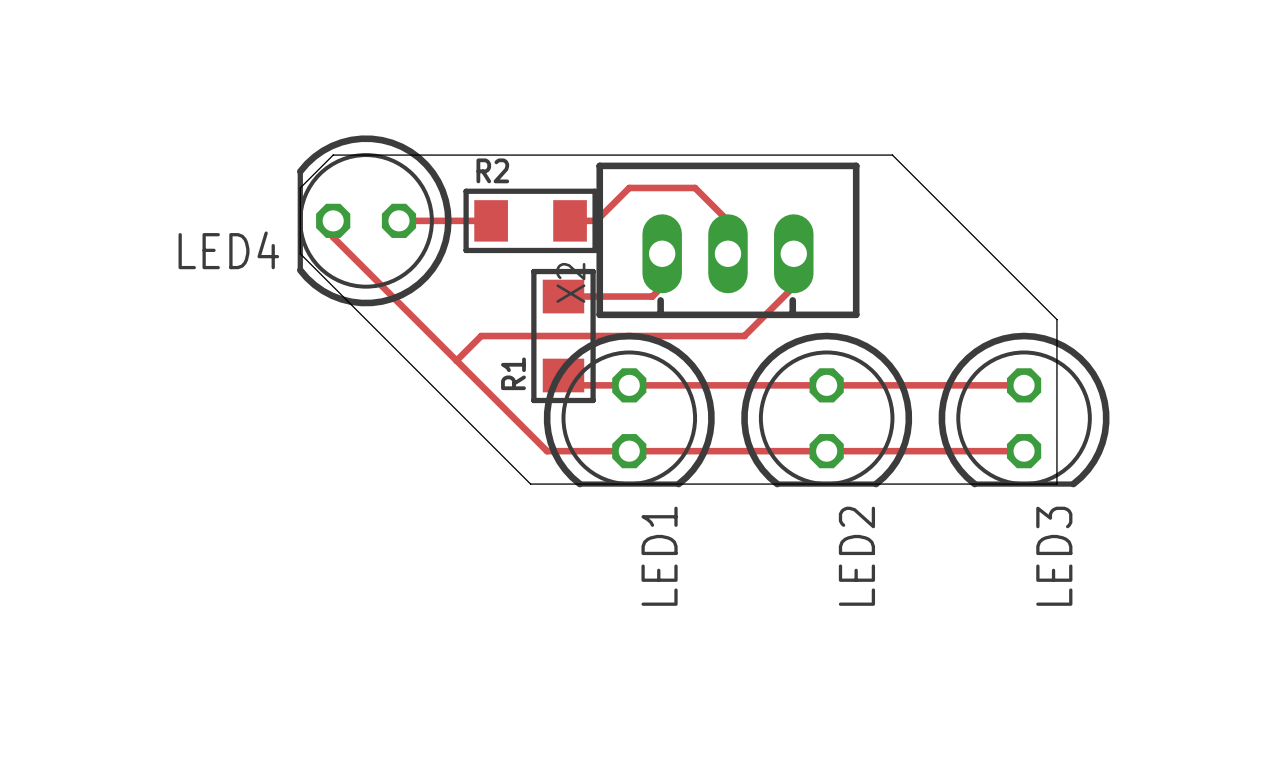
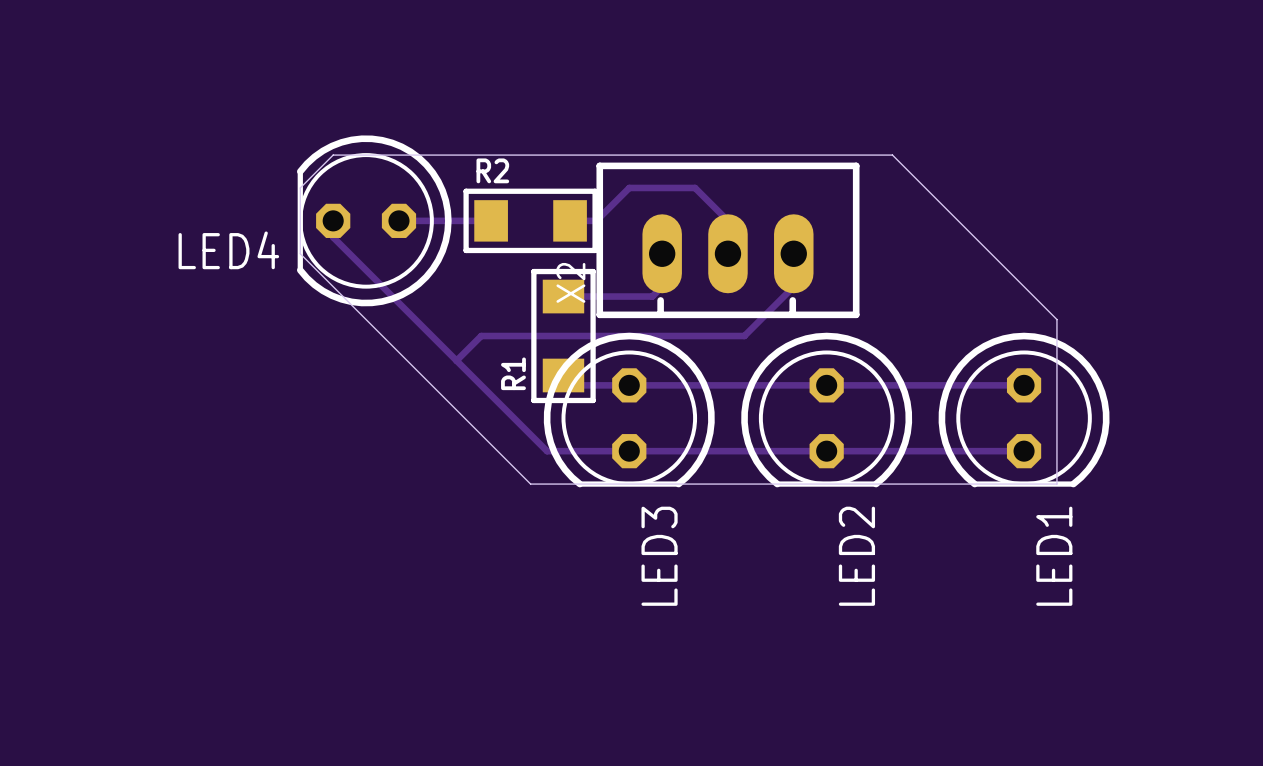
LED1 name: LED1 (659, 556) -> LED3 (659, 556)
LED3 name: LED3 (1054, 556) -> LED1 (1054, 556)

